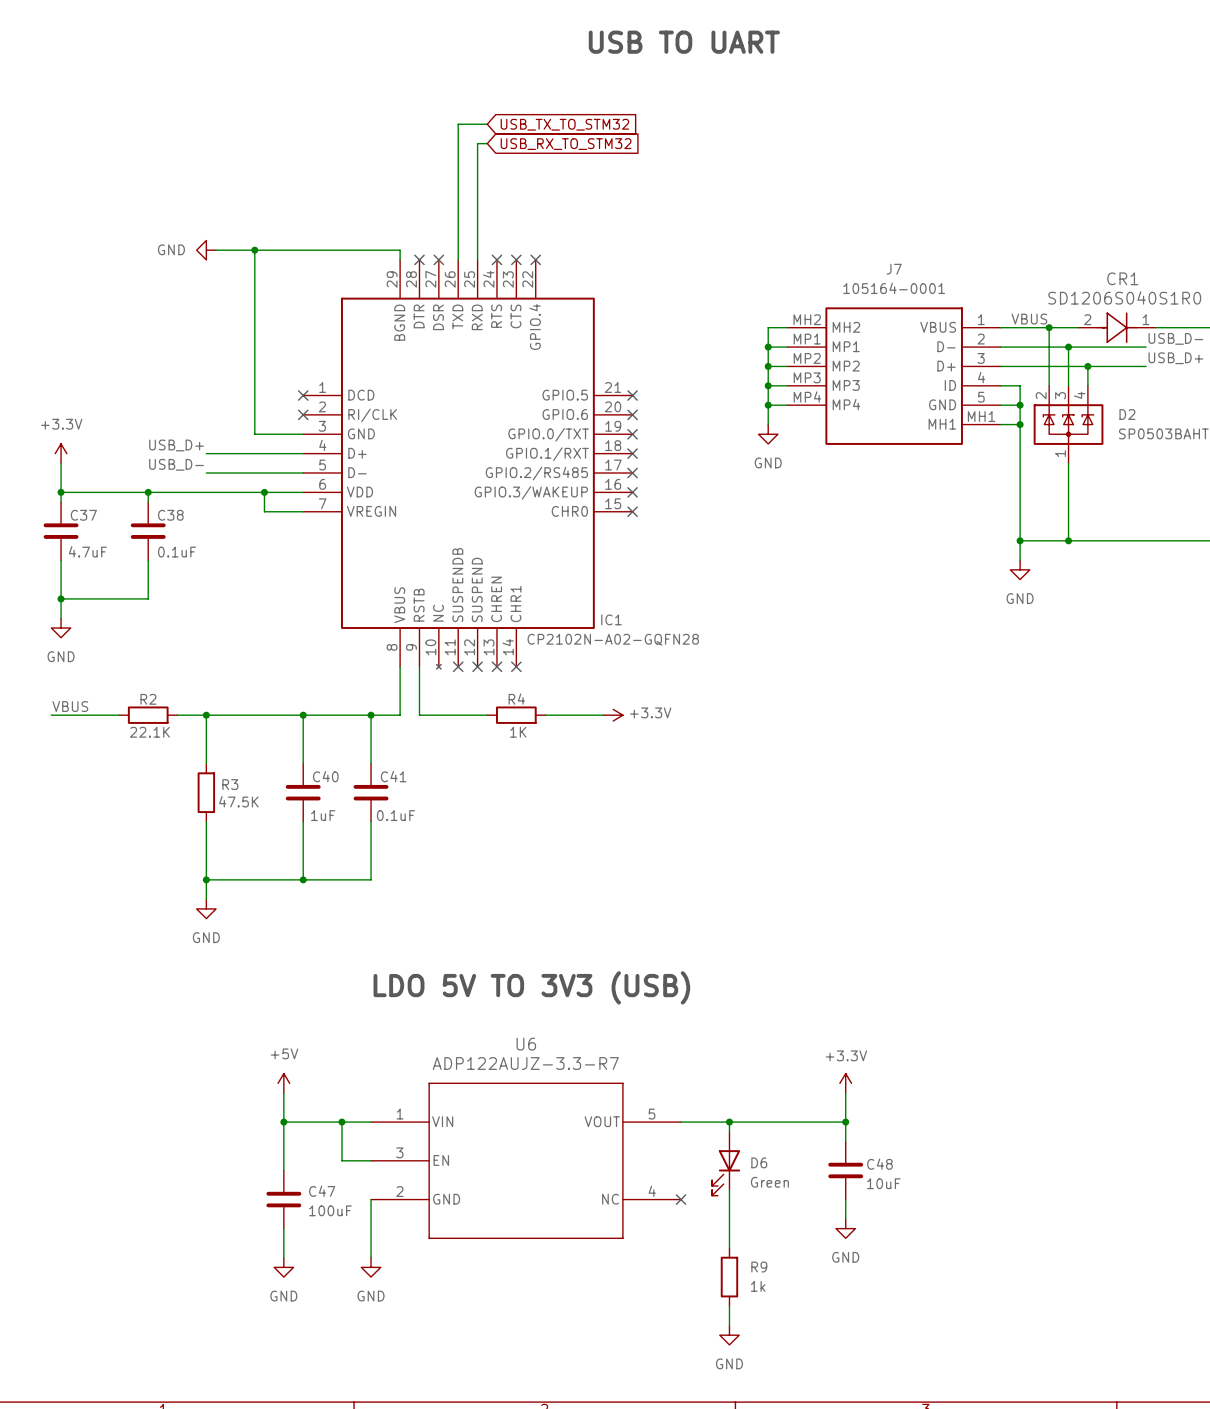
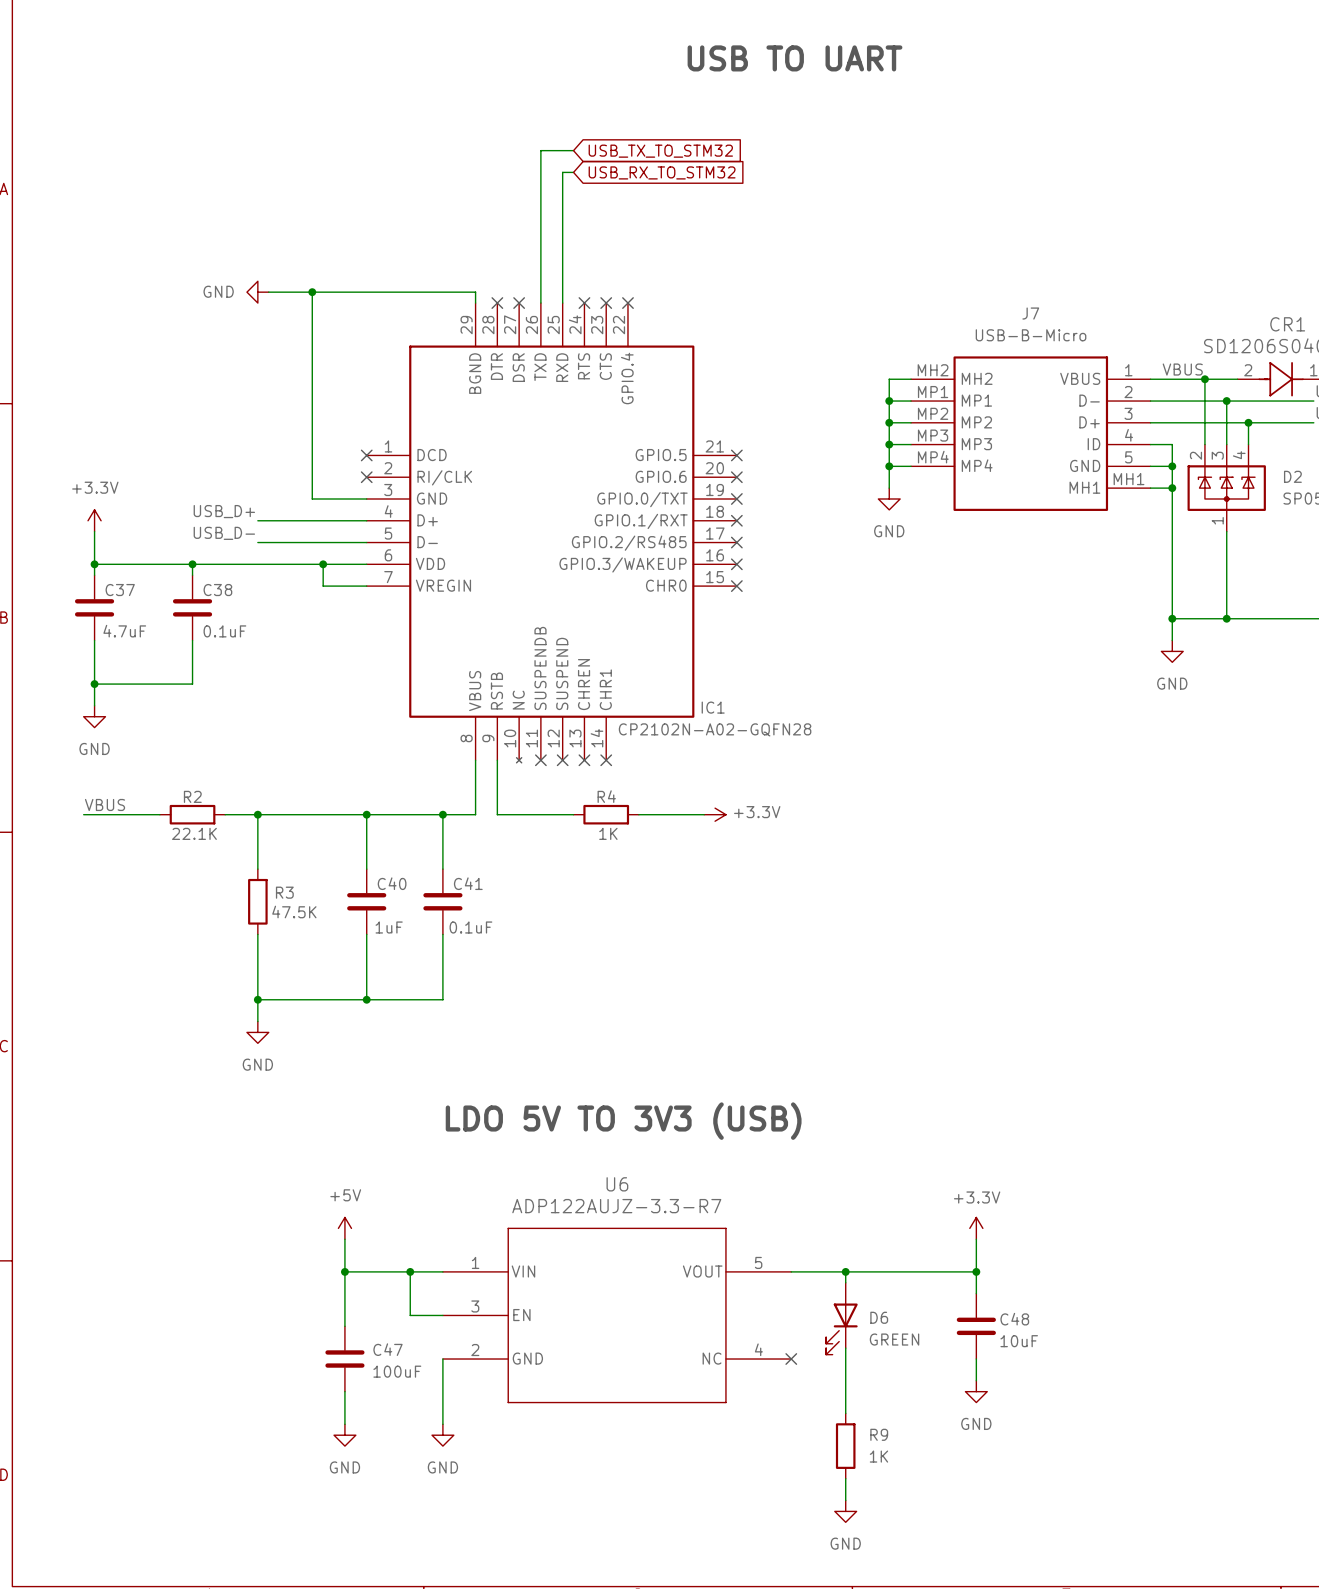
J7 value: 105164-0001 (894, 288) -> USB-B-Micro (1031, 335)
D6 value: Green (769, 1182) -> GREEN (894, 1339)
R9 value: 1k (758, 1286) -> 1K (878, 1456)

